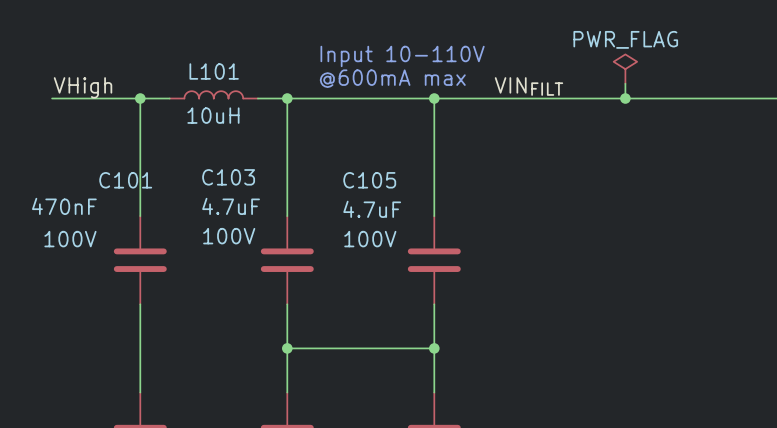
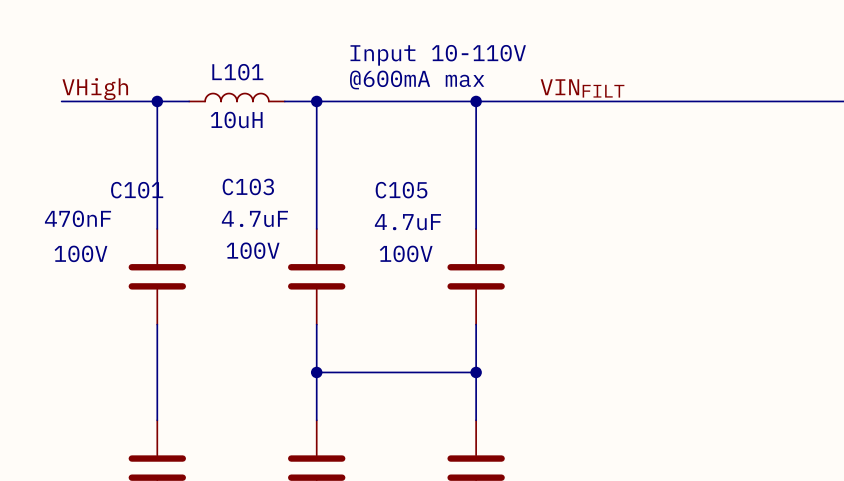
power symbol: PWR_FLAG (625, 69) -> none
wire: (625, 83) (625, 98) -> none
junction: (625, 98) -> none

